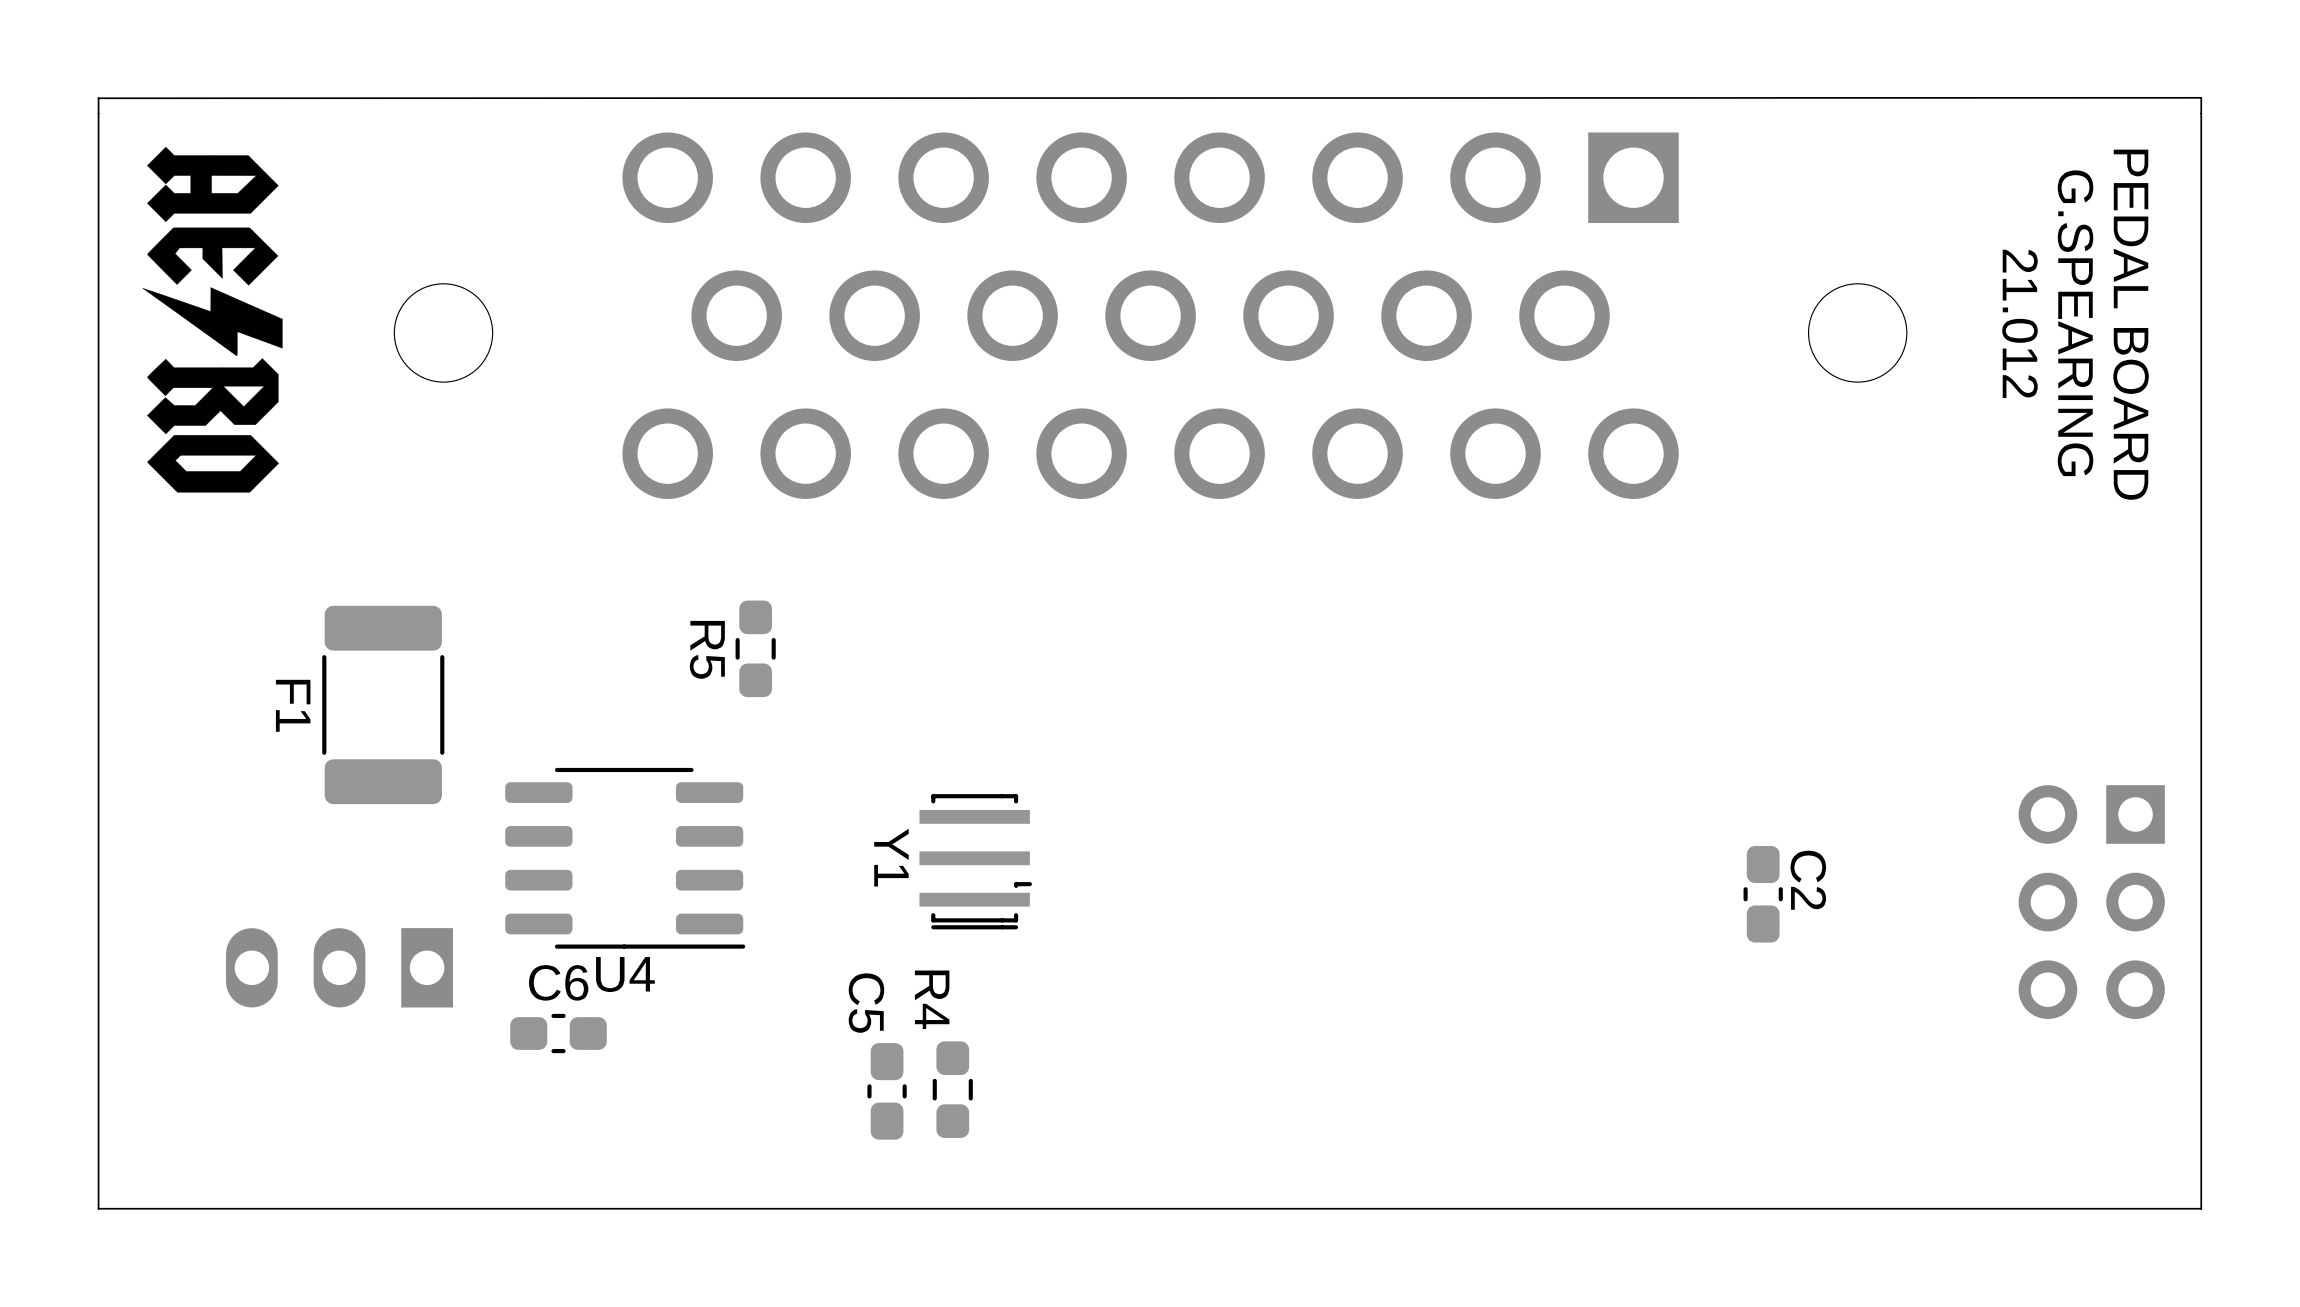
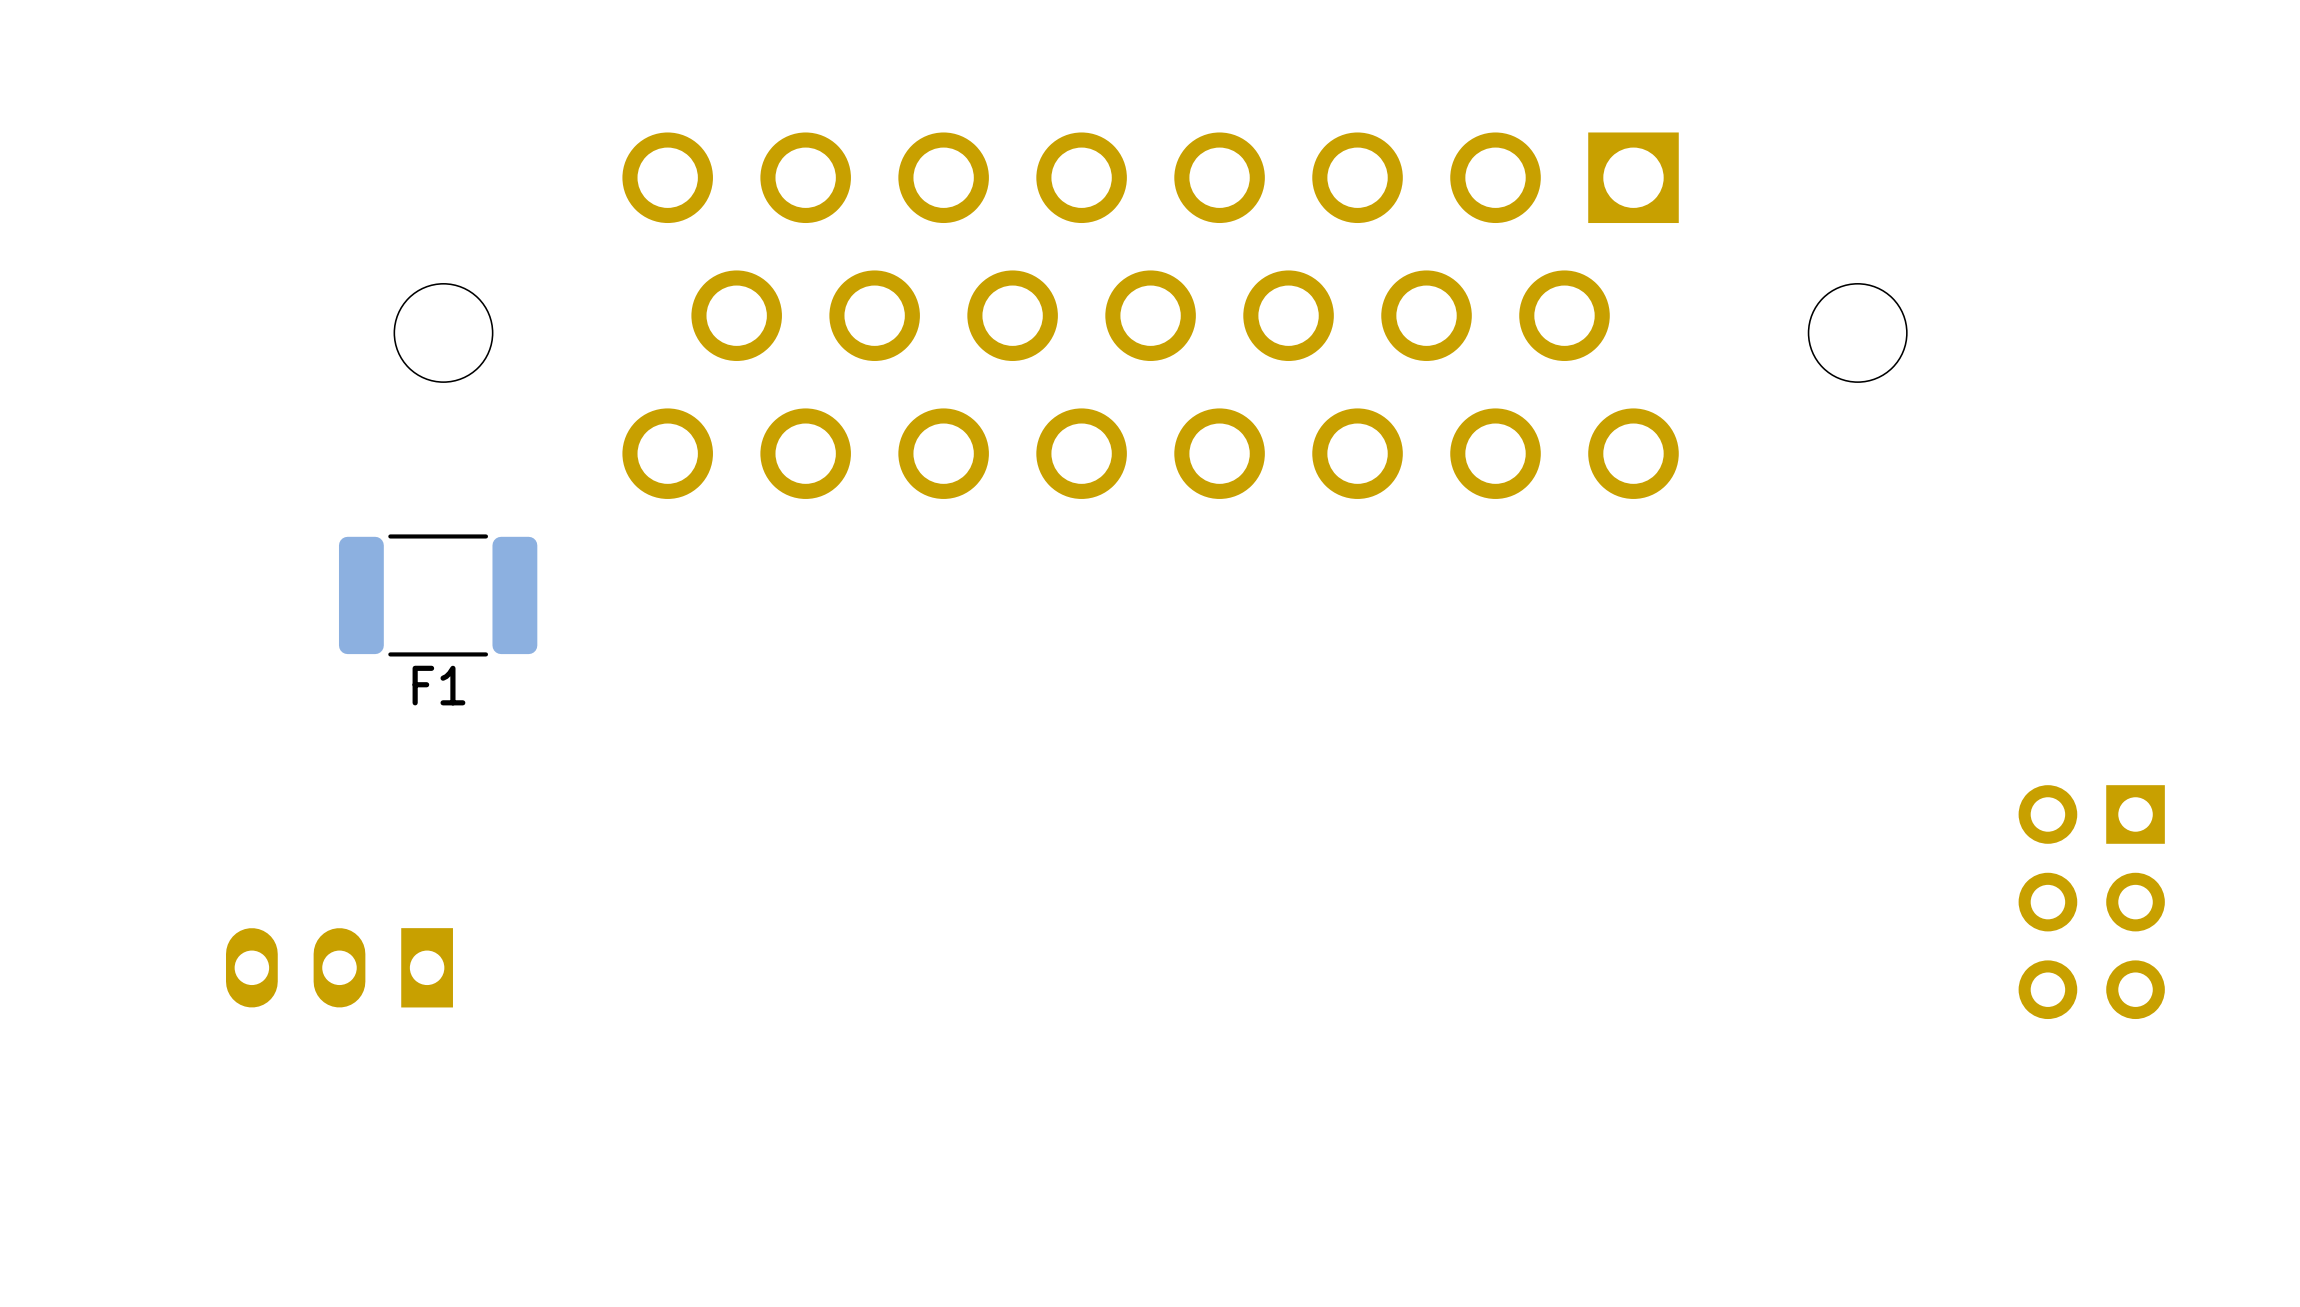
board edge: (2201, 97) (98, 98) (98, 1208) (2201, 1208) (2201, 97) -> none
drawing: [142, 146, 283, 493] -> none
text: 21.012 (2019, 323) -> none
text: G.SPEARING (2075, 323) -> none
text: PEDAL BOARD (2131, 324) -> none
R5: (755, 648) -> none
F1 rotation: 0° (383, 704) -> 90° clockwise (438, 595)
F1 position: (383, 704) -> (438, 595)
F1 name position: F1 (293, 705) -> F1 (438, 685)
U4: (625, 858) -> none
Y1: (975, 861) -> none
C2: (1763, 894) -> none
C6: (558, 1033) -> none
R4: (952, 1089) -> none
C5: (887, 1091) -> none

